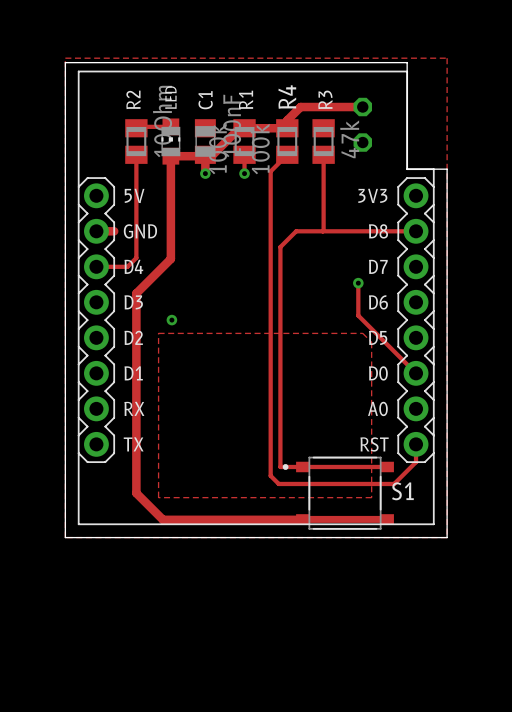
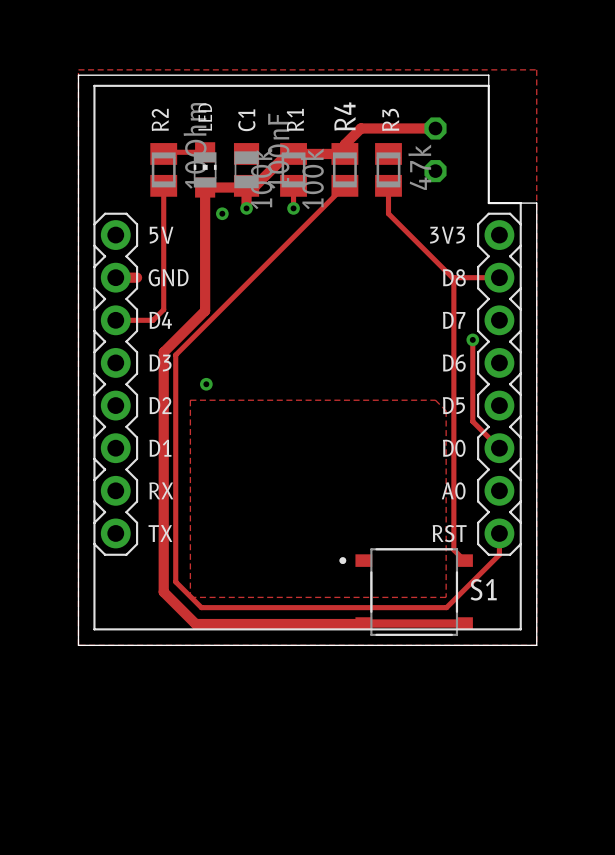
track: (270, 171) (270, 475) (278, 483) (394, 483) -> (324, 205) (175, 355) (175, 581) (201, 607) (446, 607) (473, 580)
via: none -> (222, 213)
track: (323, 178) (322, 231) -> (388, 213) (452, 277)
track: (376, 231) (296, 231) (280, 247) (280, 466) (386, 466) -> (453, 277) (453, 549) (464, 560)
track: (358, 283) (358, 315) (393, 351) -> (472, 339) (472, 421)
via position: (358, 283) -> (472, 339)

